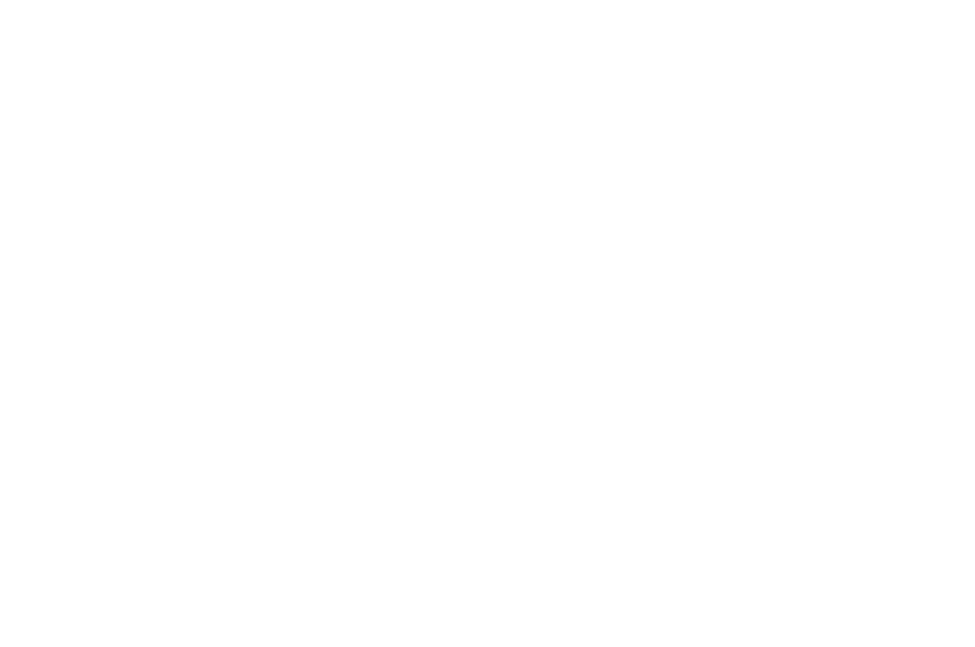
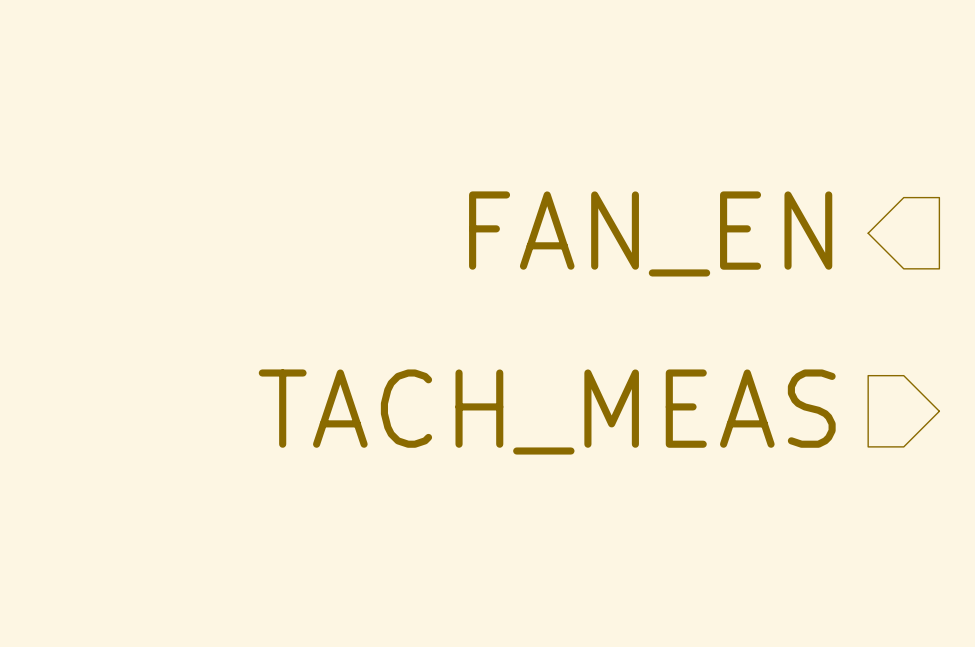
hierarchical label: none -> FAN_EN (650, 233)
hierarchical label: none -> TACH_MEAS (547, 412)

